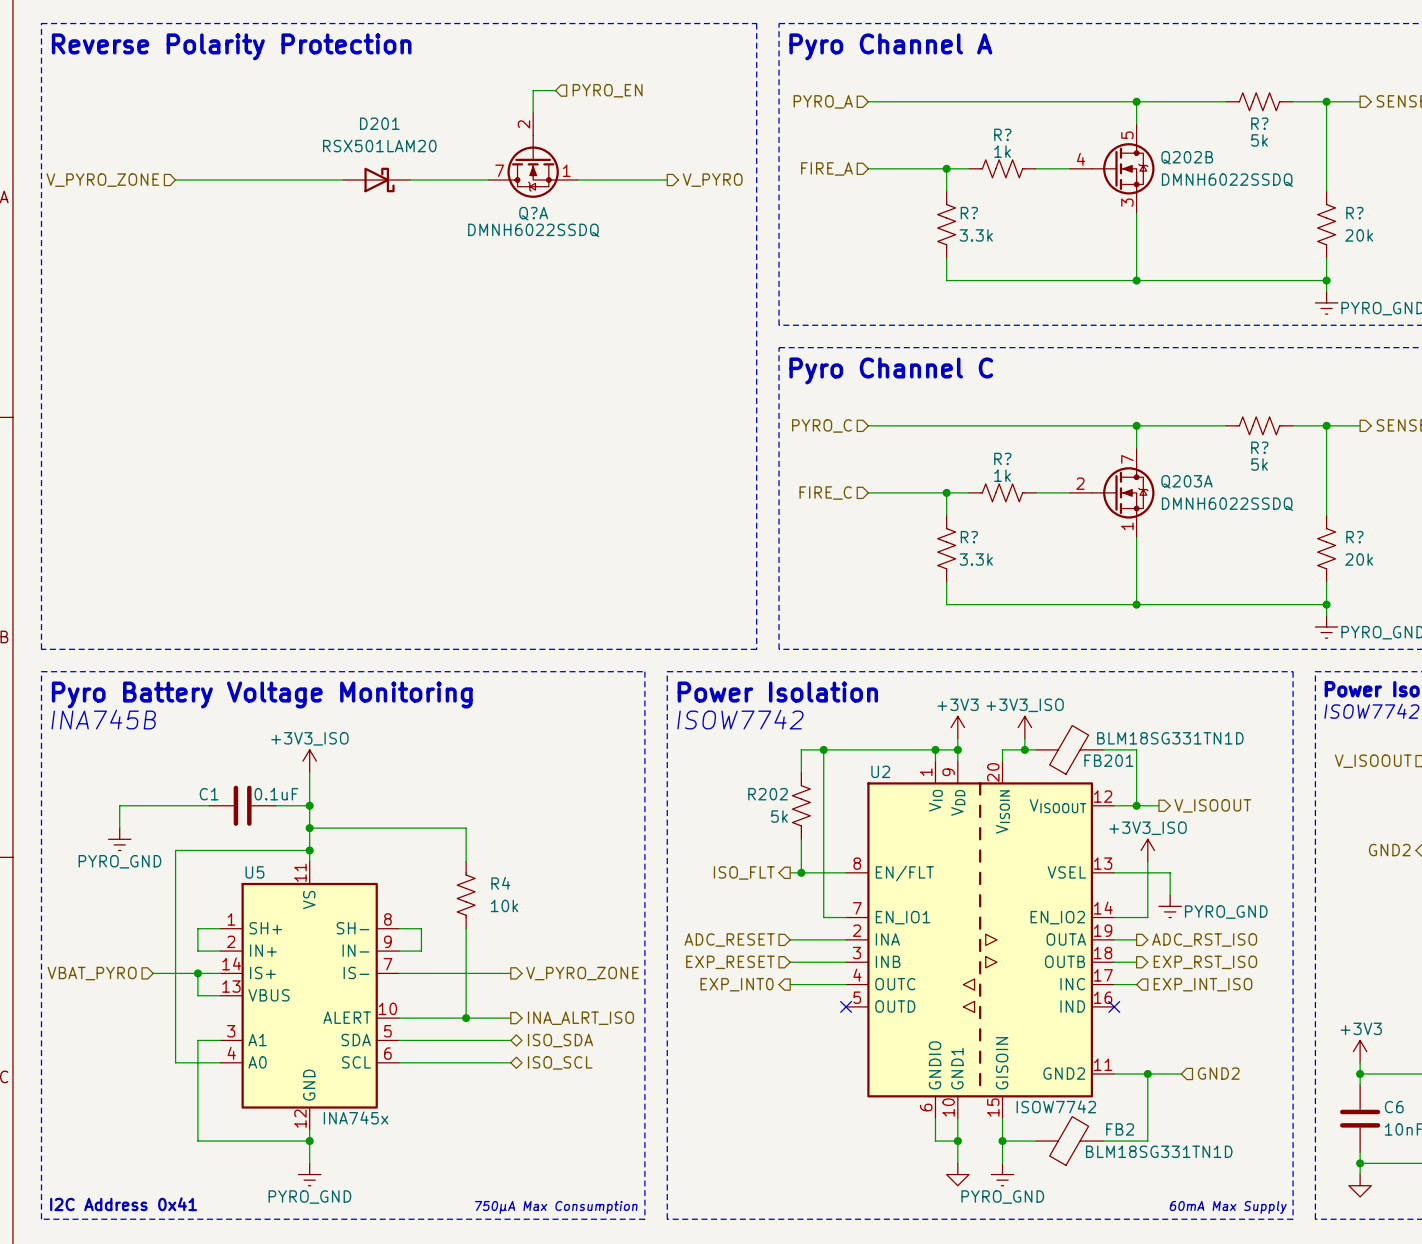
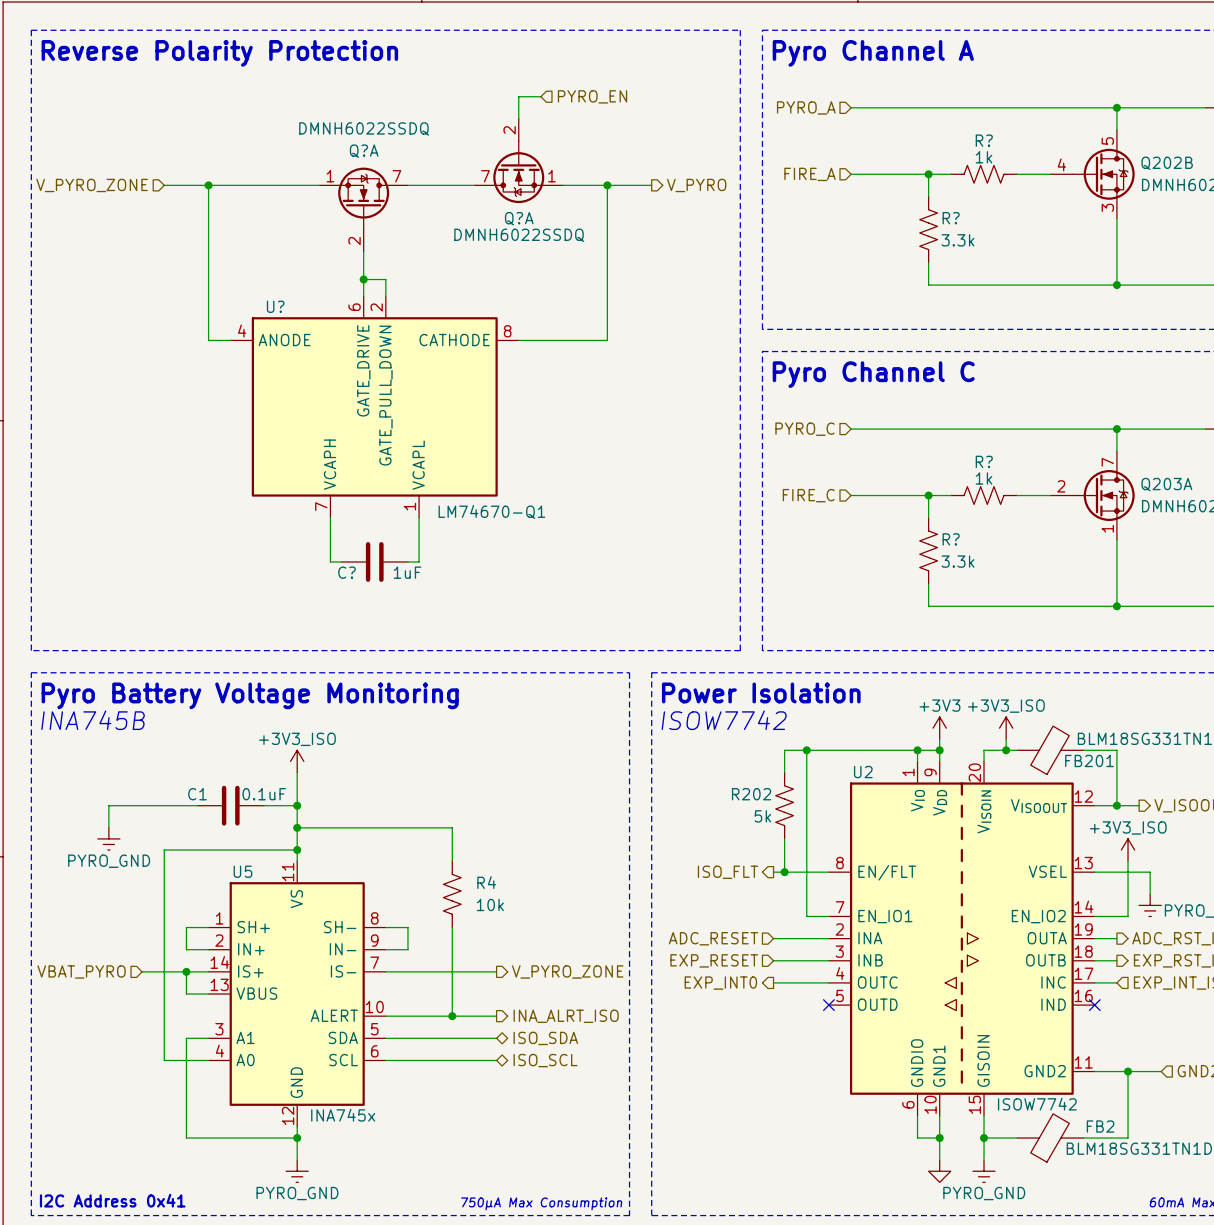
wire: none -> (208, 185) (208, 340) (230, 340)
junction: none -> (208, 185)
D201: RSX501LAM20 (376, 179) -> none
wire: none -> (607, 185) (607, 340) (518, 340)
junction: none -> (607, 185)
Q?A: none -> DMNH6022SSDQ (363, 209)
wire: none -> (363, 251) (363, 296)
wire: none -> (363, 279) (385, 279) (385, 296)
junction: none -> (363, 279)
U?: none -> LM74670-Q1 (374, 406)
wire: none -> (330, 517) (330, 561) (341, 561)
wire: none -> (419, 517) (419, 561) (407, 561)
C?: none -> 1uF (374, 561)

